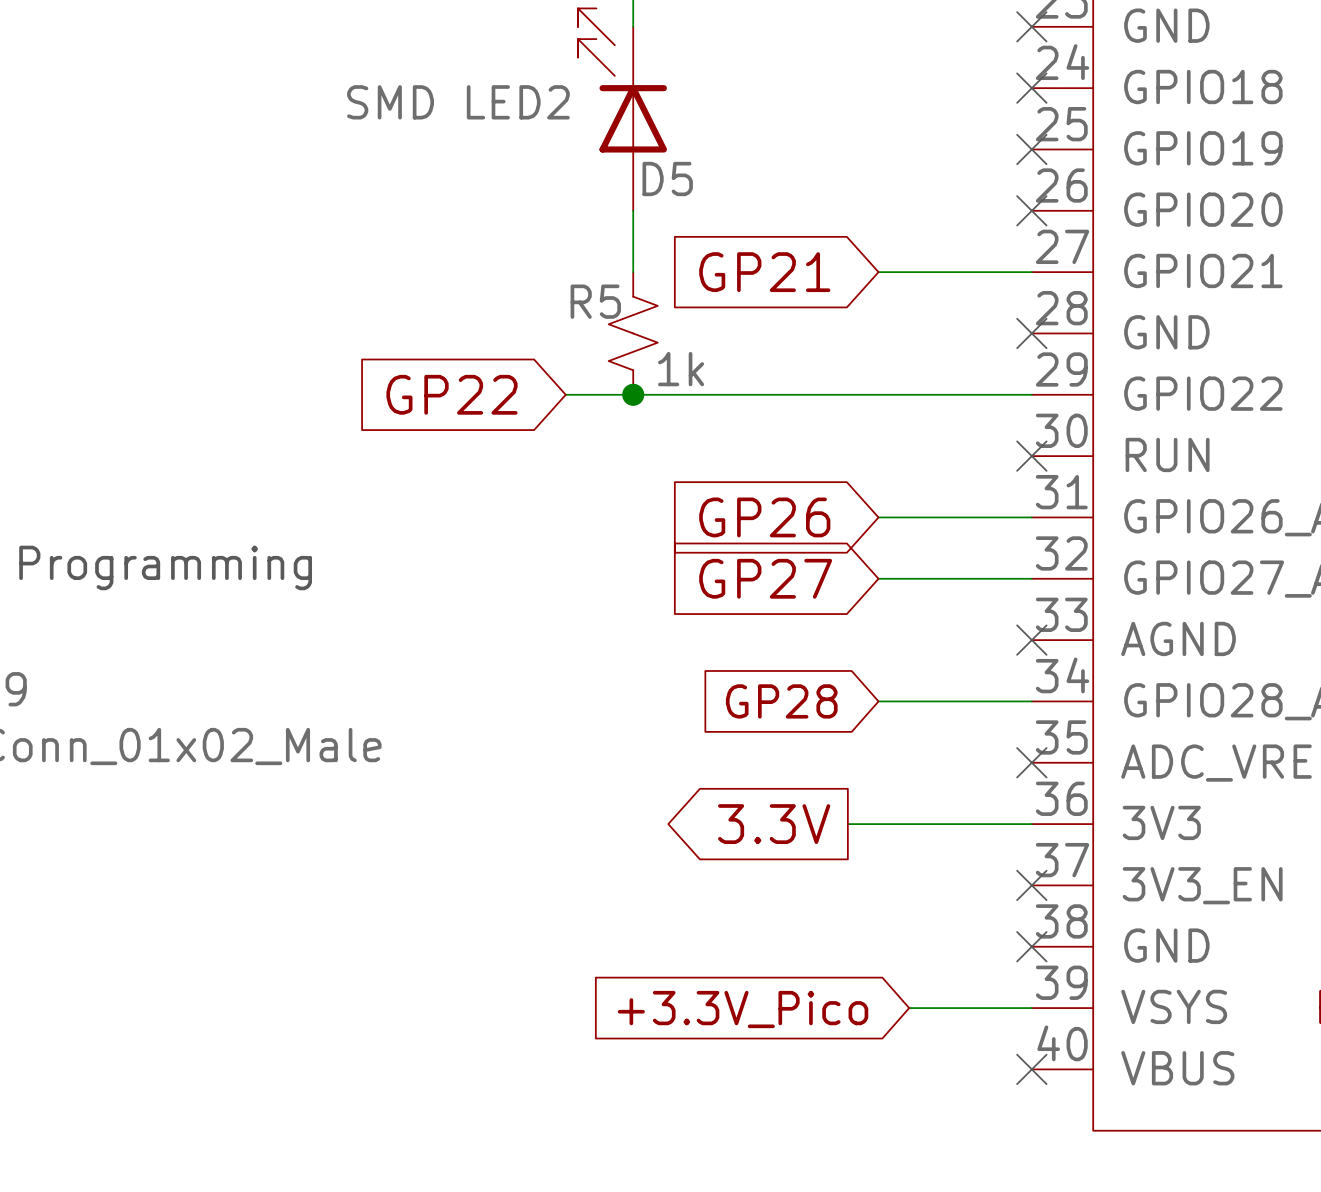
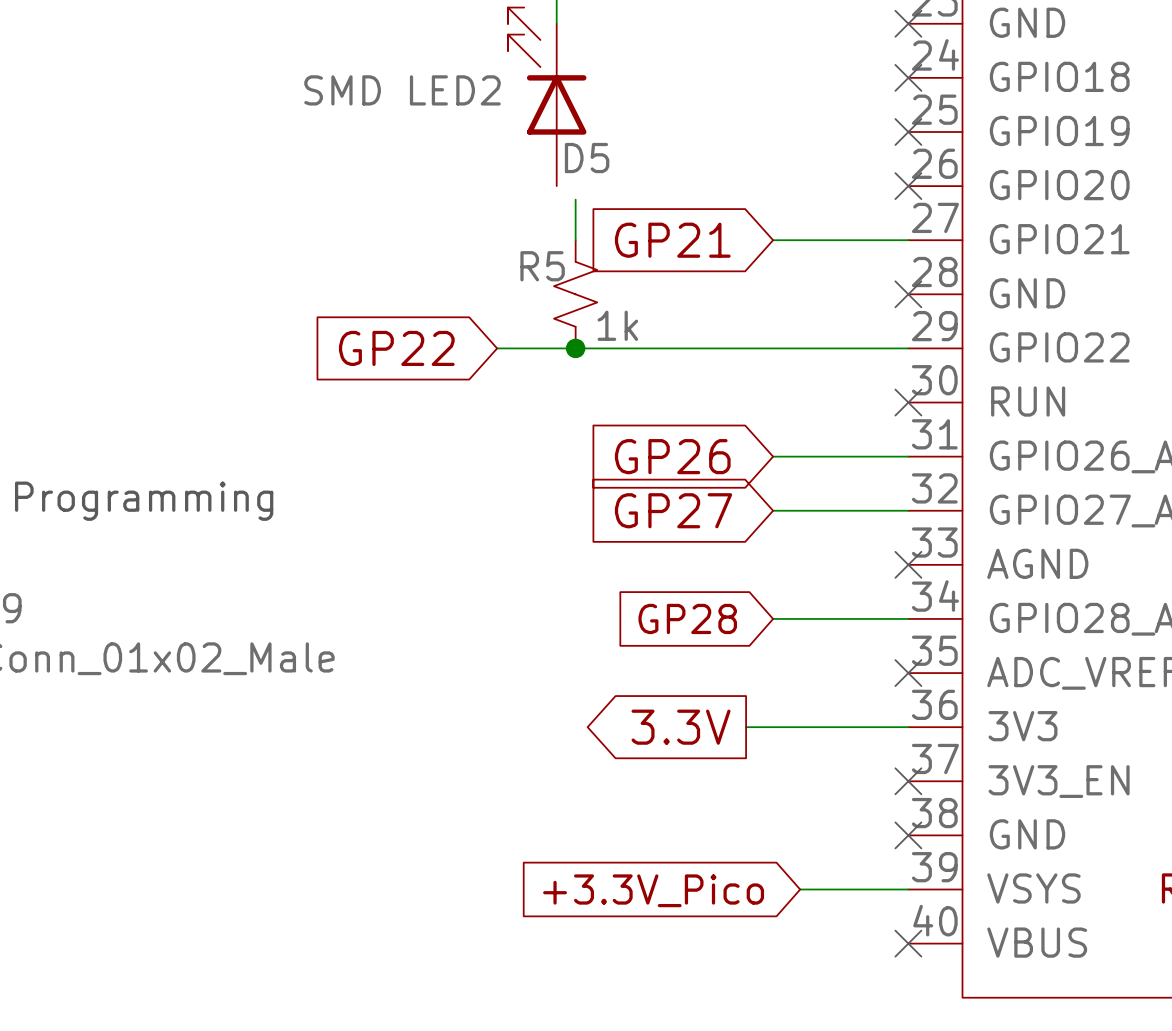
wire: (633, 210) (633, 272) -> none
wire: none -> (575, 199) (575, 240)
R5 position: (633, 333) -> (575, 294)
junction position: (633, 394) -> (575, 348)

